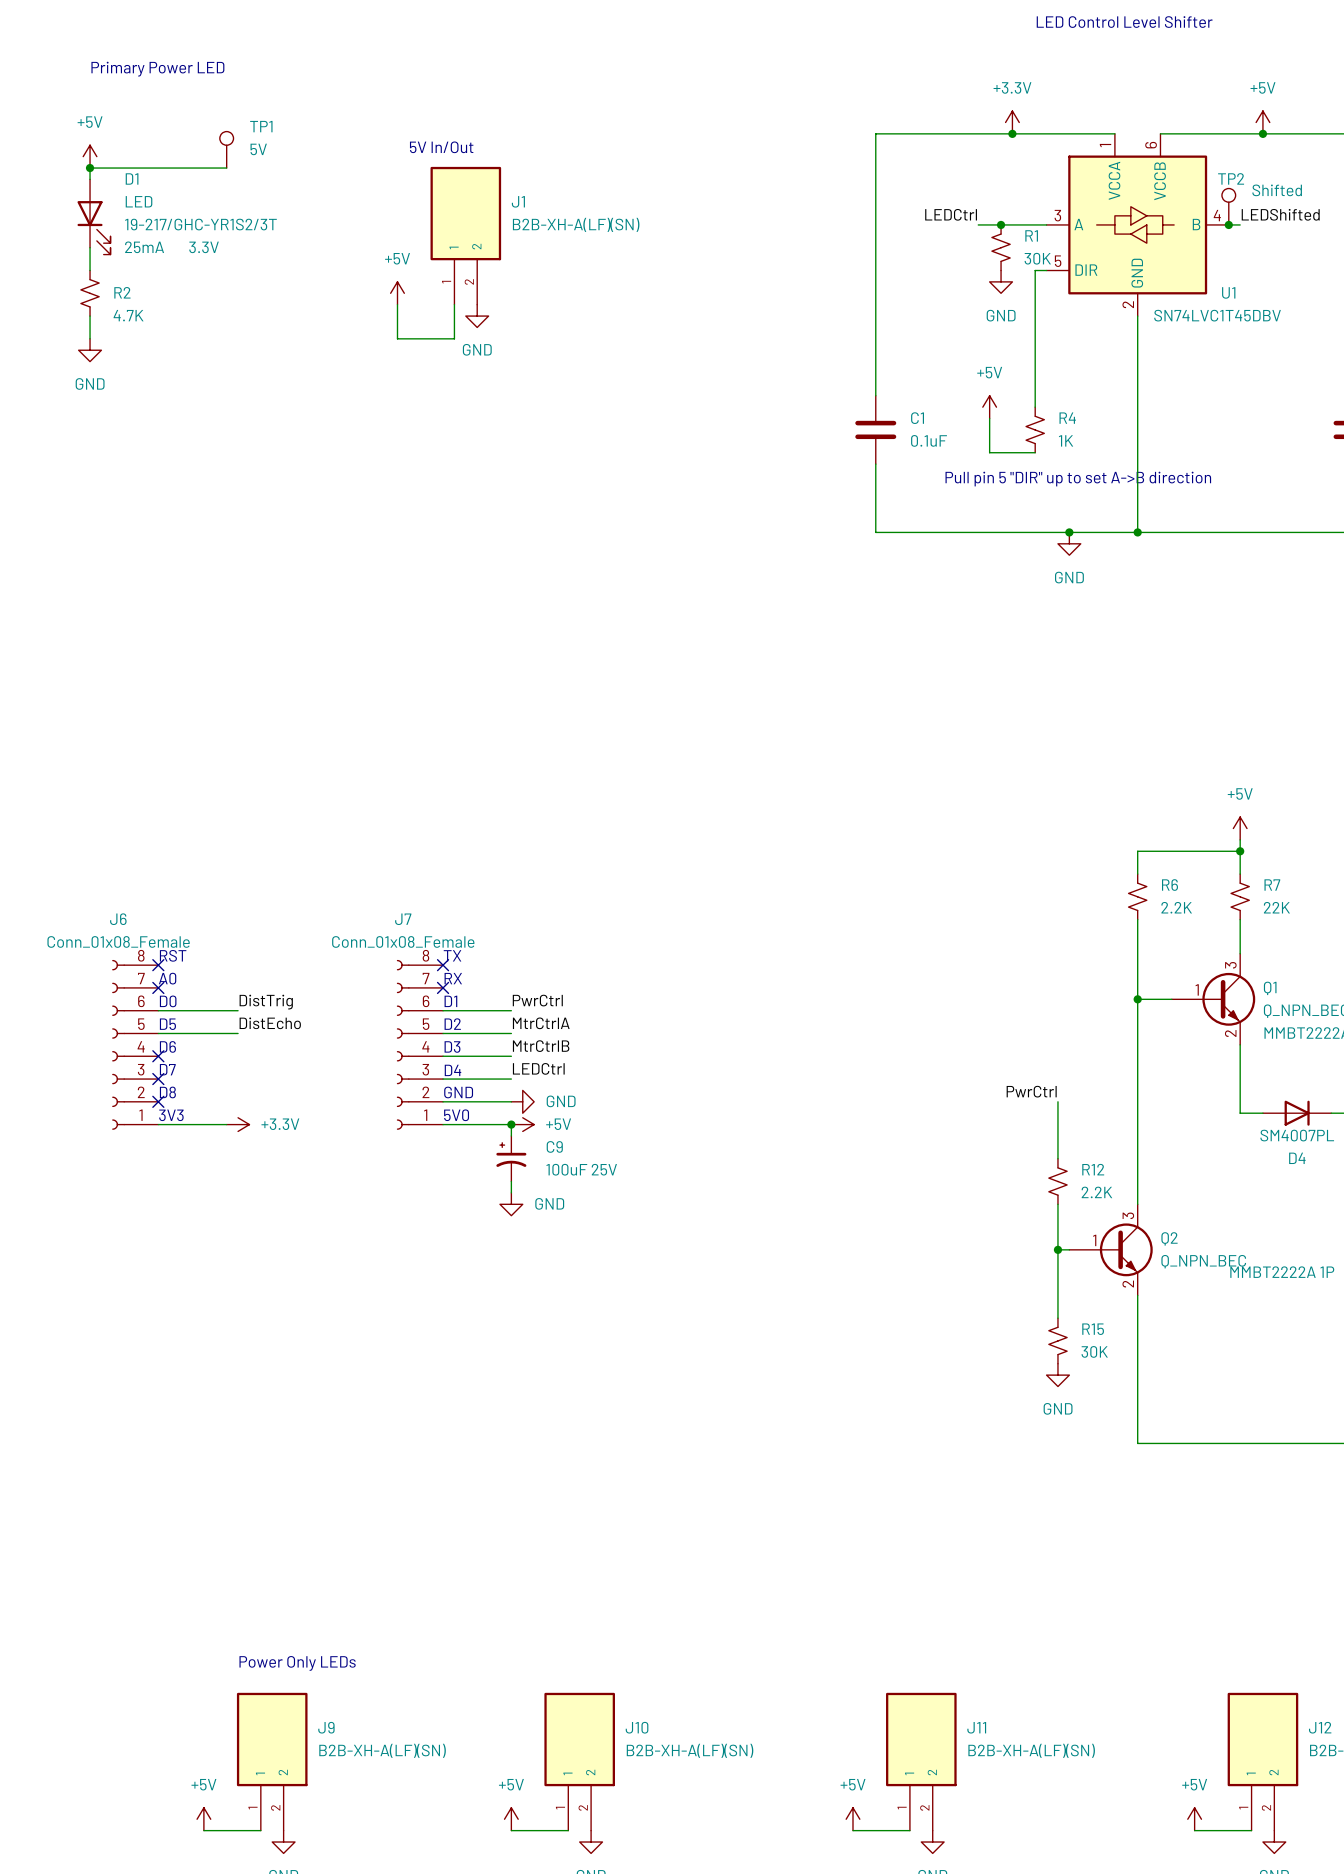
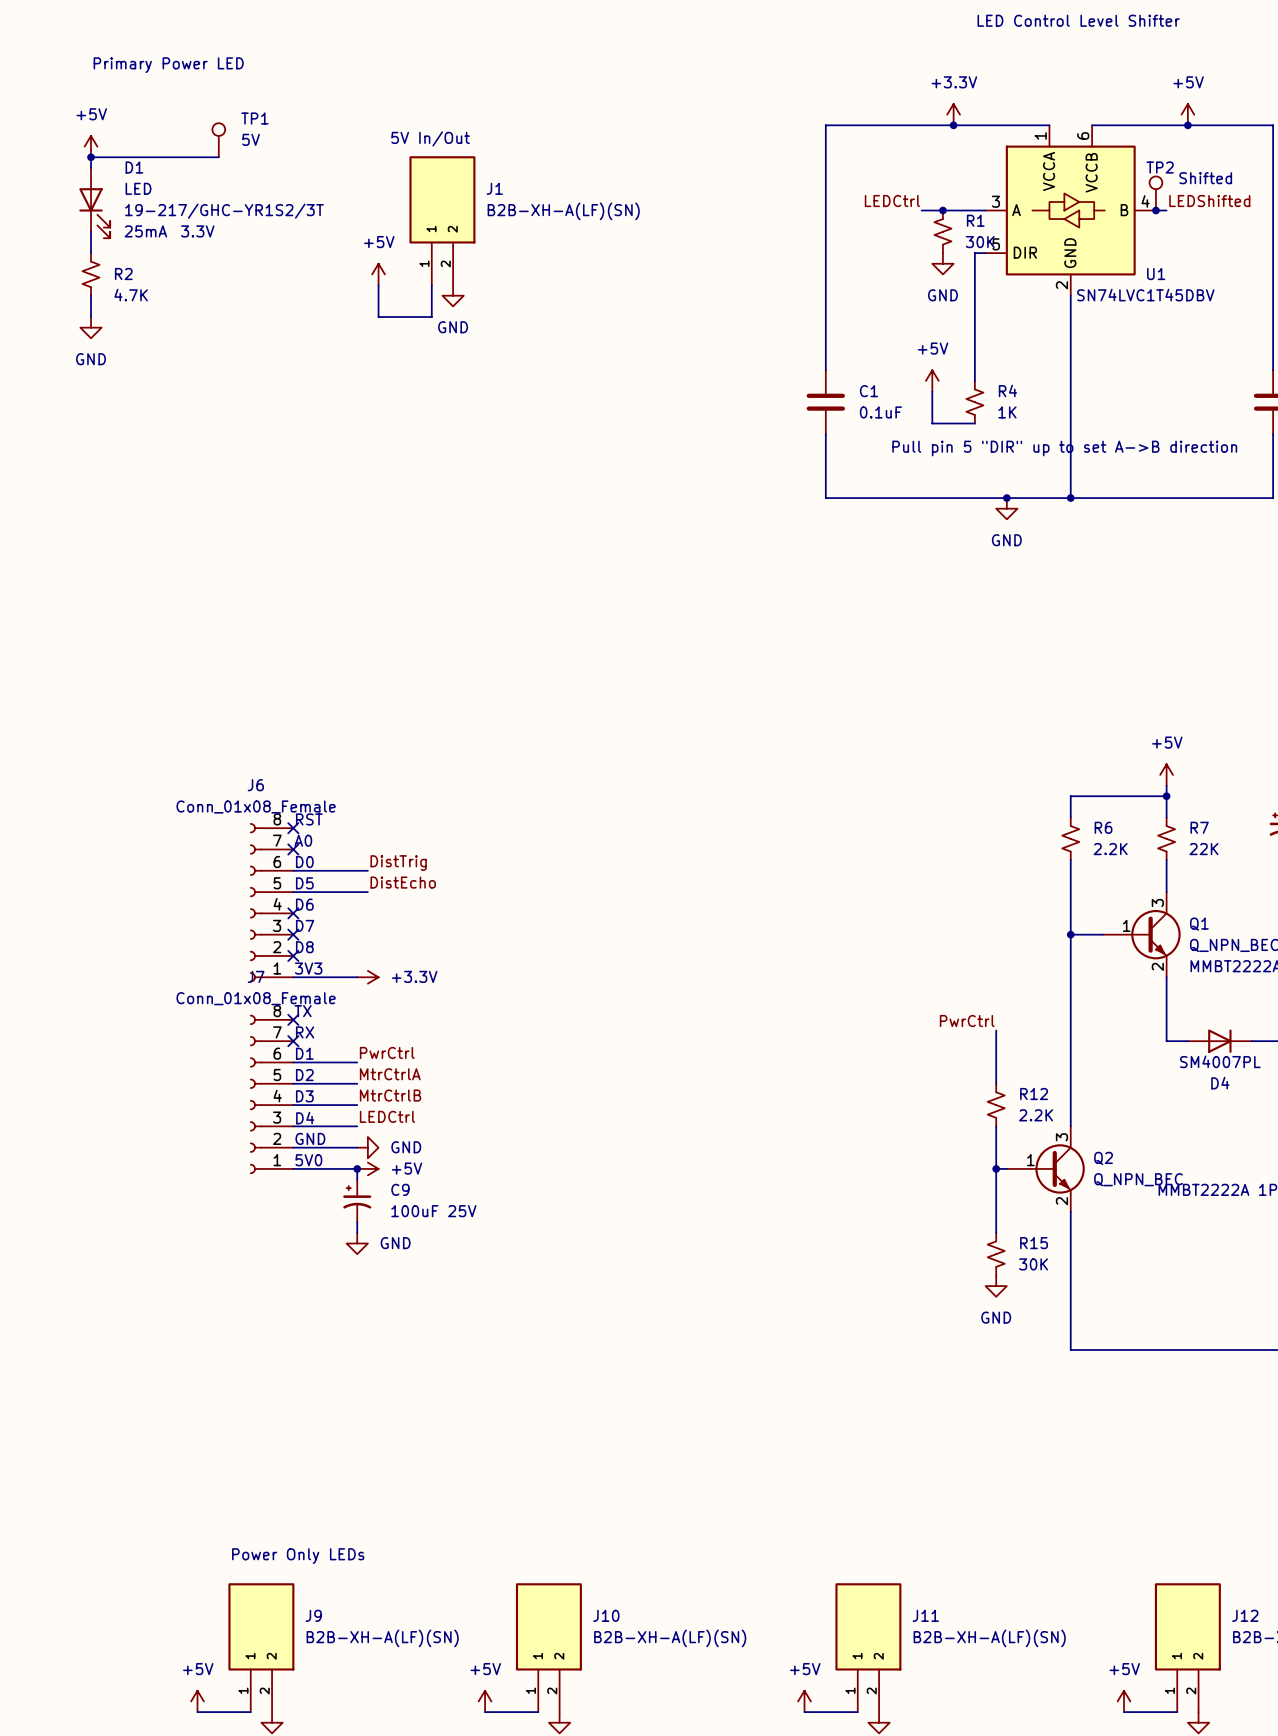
no-connect mark: none -> (293, 828)
no-connect mark: none -> (293, 849)
text position: RST (173, 955) -> RST (309, 819)
text position: TX (452, 955) -> TX (303, 1011)
no-connect mark: (158, 965) -> none
no-connect mark: (443, 965) -> none
no-connect mark: none -> (293, 913)
text position: A0 (167, 978) -> A0 (303, 840)
text position: RX (453, 978) -> RX (305, 1032)
no-connect mark: (158, 987) -> none
no-connect mark: (443, 987) -> none
no-connect mark: none -> (293, 934)
label position: PwrCtrl (537, 1000) -> PwrCtrl (387, 1052)
text position: D0 (168, 1001) -> D0 (304, 862)
text position: D1 (450, 1001) -> D1 (304, 1053)
label position: DistTrig (266, 1002) -> DistTrig (398, 863)
wire: (158, 1010) (238, 1010) -> (293, 870) (367, 870)
wire: (443, 1010) (511, 1010) -> (293, 1062) (357, 1062)
no-connect mark: none -> (293, 955)
label position: DistEcho (270, 1023) -> DistEcho (403, 882)
label position: MtrCtrlA (541, 1023) -> MtrCtrlA (390, 1074)
text position: D5 (167, 1024) -> D5 (304, 883)
text position: D2 (452, 1024) -> D2 (304, 1075)
wire: (158, 1033) (238, 1033) -> (293, 892) (367, 892)
wire: (443, 1033) (511, 1033) -> (293, 1083) (357, 1083)
J6 position: (135, 1044) -> (271, 902)
J7 position: (419, 1044) -> (271, 1094)
text position: D6 (167, 1046) -> D6 (304, 904)
label position: MtrCtrlB (541, 1046) -> MtrCtrlB (390, 1095)
text position: D3 (452, 1047) -> D3 (304, 1096)
no-connect mark: (158, 1056) -> none
wire: (443, 1056) (511, 1056) -> (293, 1105) (357, 1105)
label position: LEDCtrl (538, 1068) -> LEDCtrl (387, 1116)
text position: D7 (167, 1069) -> D7 (305, 925)
text position: D4 (452, 1070) -> D4 (305, 1118)
no-connect mark: (158, 1079) -> none
wire: (443, 1079) (511, 1079) -> (293, 1126) (357, 1126)
no-connect mark: none -> (293, 1019)
text position: D8 (167, 1092) -> D8 (304, 947)
text position: GND (458, 1092) -> GND (310, 1138)
no-connect mark: (158, 1101) -> none
wire: (443, 1101) (511, 1101) -> (293, 1147) (357, 1147)
power symbol: GND (522, 1101) -> none
no-connect mark: none -> (293, 1041)
text position: 3V3 (171, 1115) -> 3V3 (308, 968)
text position: 5V0 (456, 1115) -> 5V0 (308, 1160)
wire: (158, 1124) (226, 1124) -> (293, 977) (357, 977)
power symbol position: +3.3V (238, 1124) -> +3.3V (367, 977)
wire: (443, 1124) (511, 1124) (511, 1135) -> (293, 1168) (357, 1168) (357, 1179)
junction: (511, 1124) -> none
power symbol position: +5V (522, 1124) -> +5V (367, 1168)
C9 position: (511, 1158) -> (357, 1200)
wire: (511, 1181) (511, 1192) -> (357, 1222) (357, 1232)
power symbol: GND (511, 1204) -> none
power symbol: none -> GND (367, 1147)
junction: none -> (357, 1168)
power symbol: none -> GND (357, 1243)

